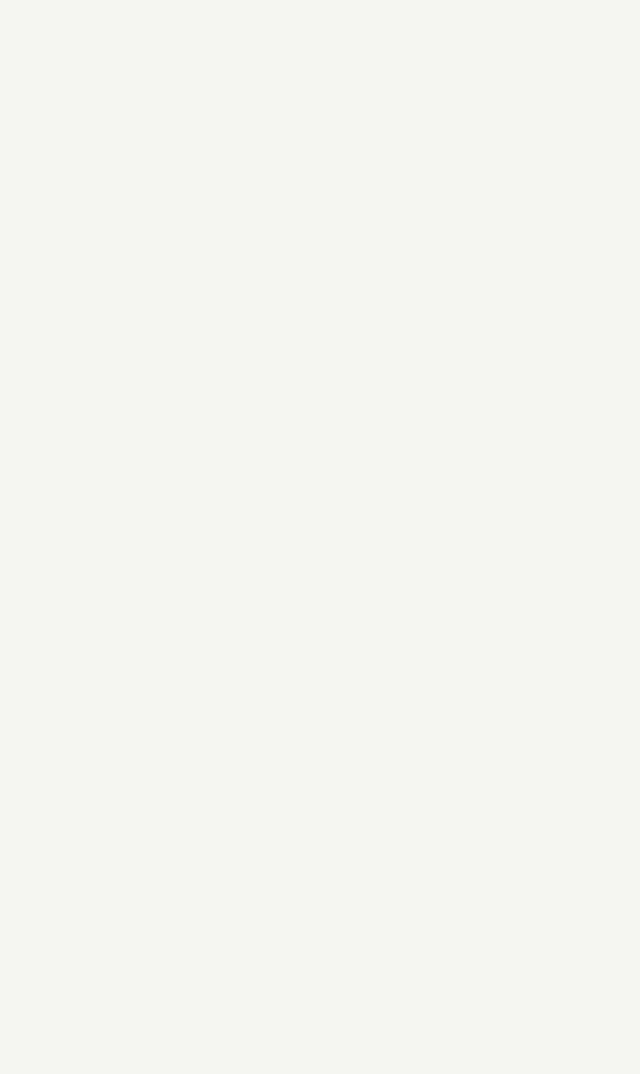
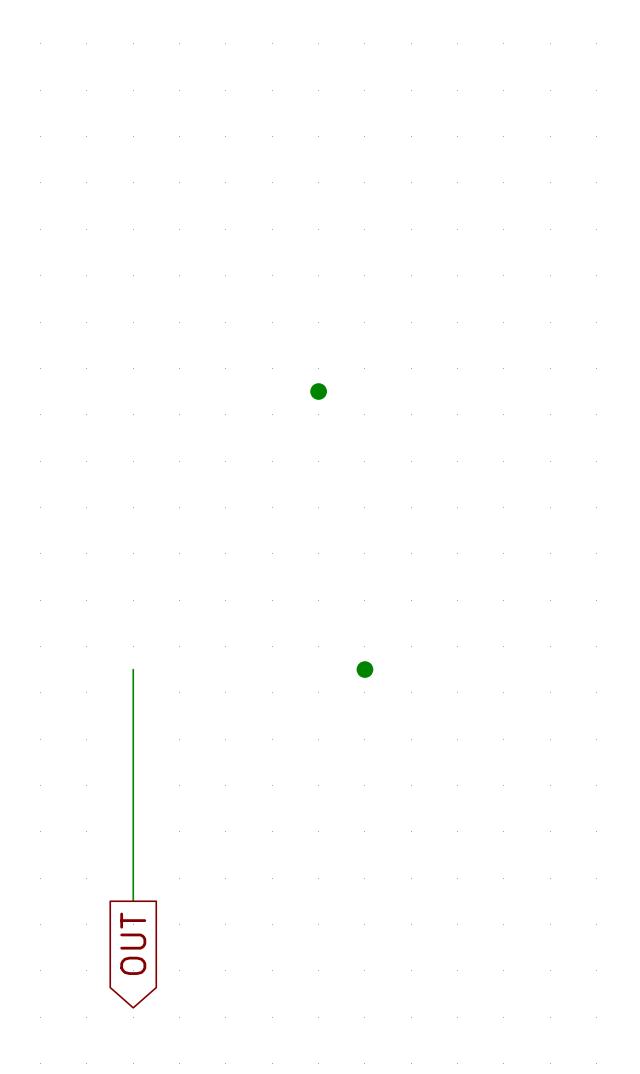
junction: none -> (318, 391)
wire: none -> (133, 669) (133, 901)
junction: none -> (364, 669)
global label: none -> OUT (133, 943)

